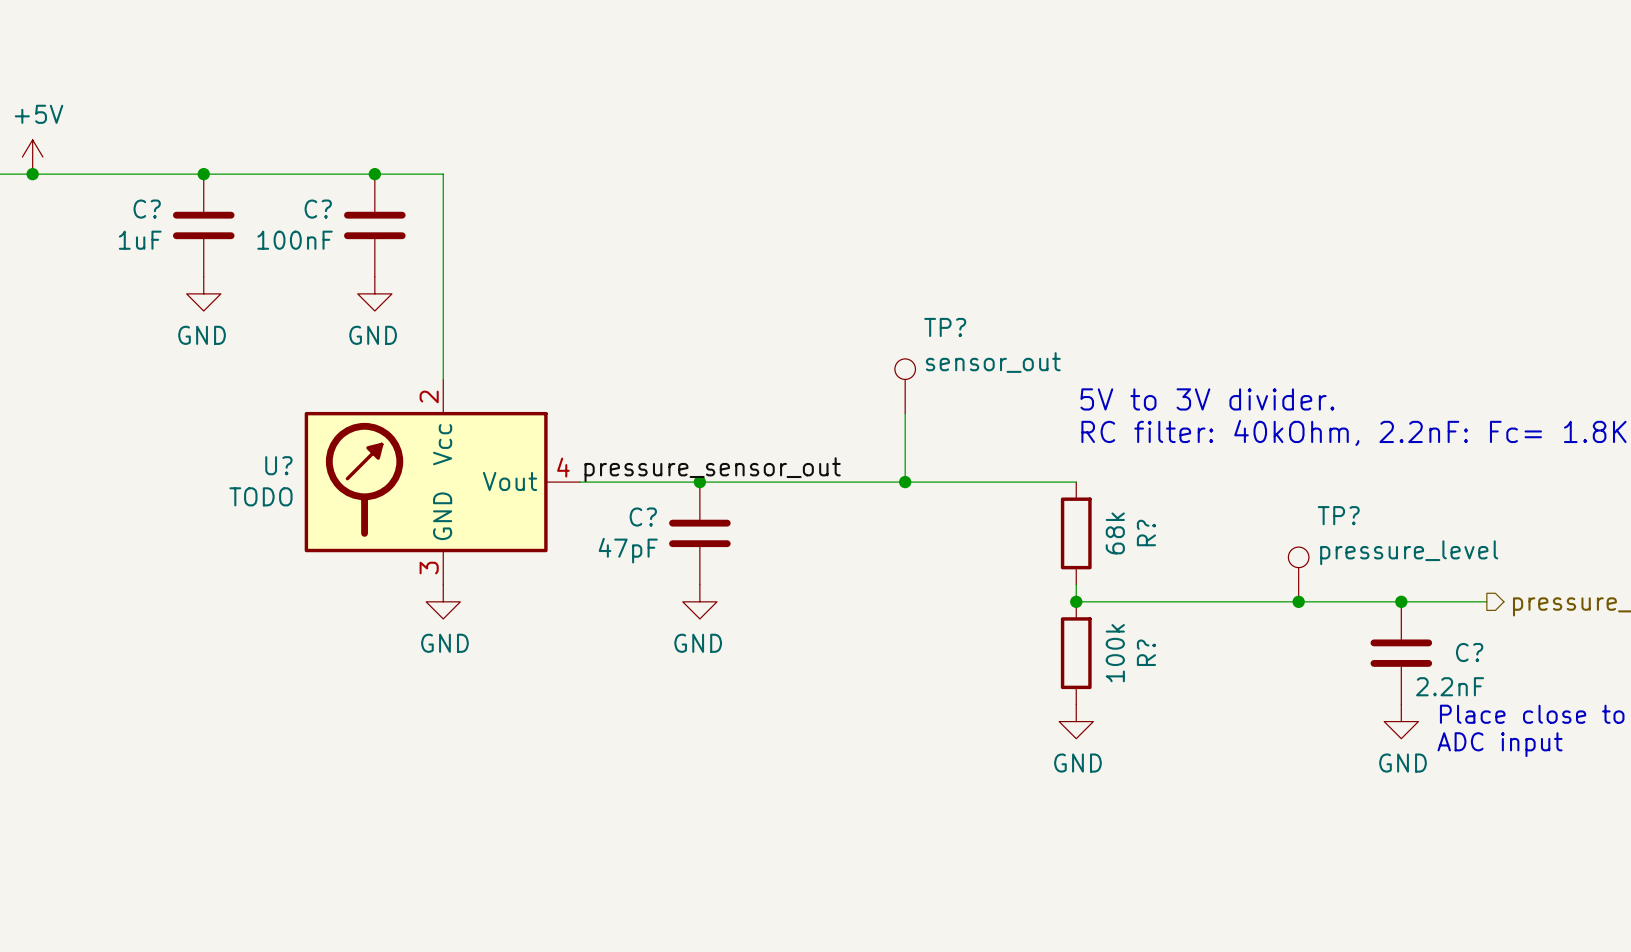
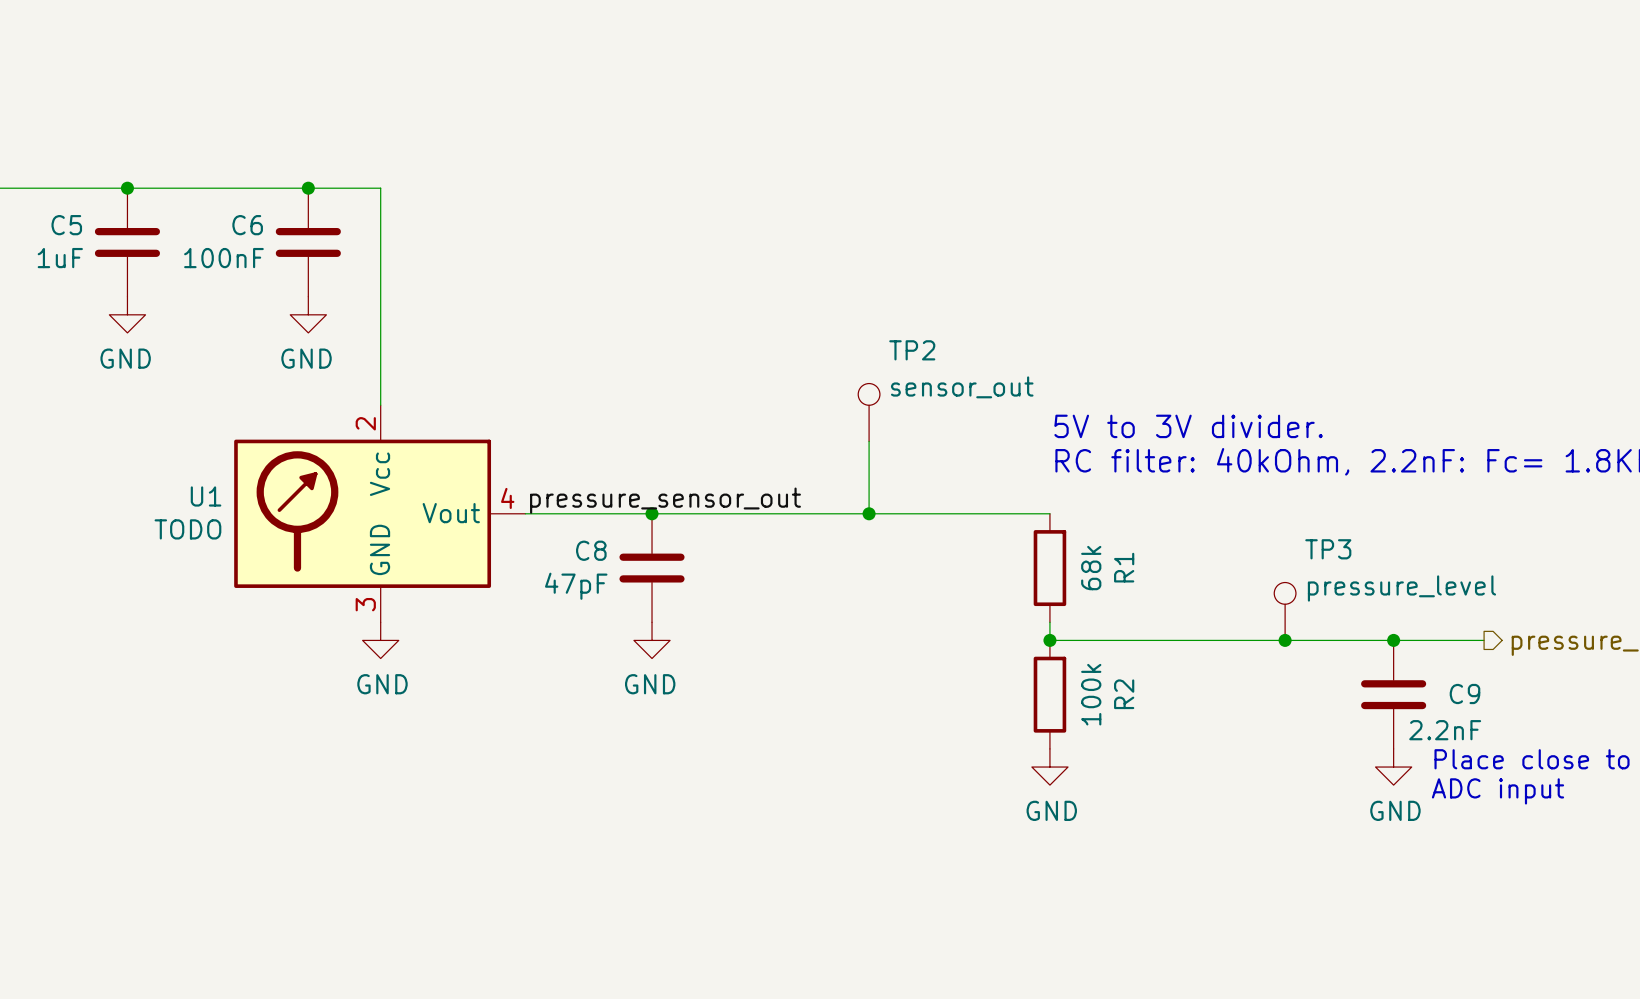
C? name: C? (147, 209) -> C5 (66, 225)
C? name: C? (318, 209) -> C6 (247, 225)
TP? name: TP? (945, 327) -> TP2 (912, 350)
U? name: U? (278, 465) -> U1 (206, 496)
TP? name: TP? (1338, 515) -> TP3 (1328, 549)
C? name: C? (643, 517) -> C8 (591, 550)
R? name: R? (1146, 532) -> R1 (1124, 567)
R? name: R? (1146, 652) -> R2 (1124, 694)
C? name: C? (1469, 652) -> C9 (1464, 694)

